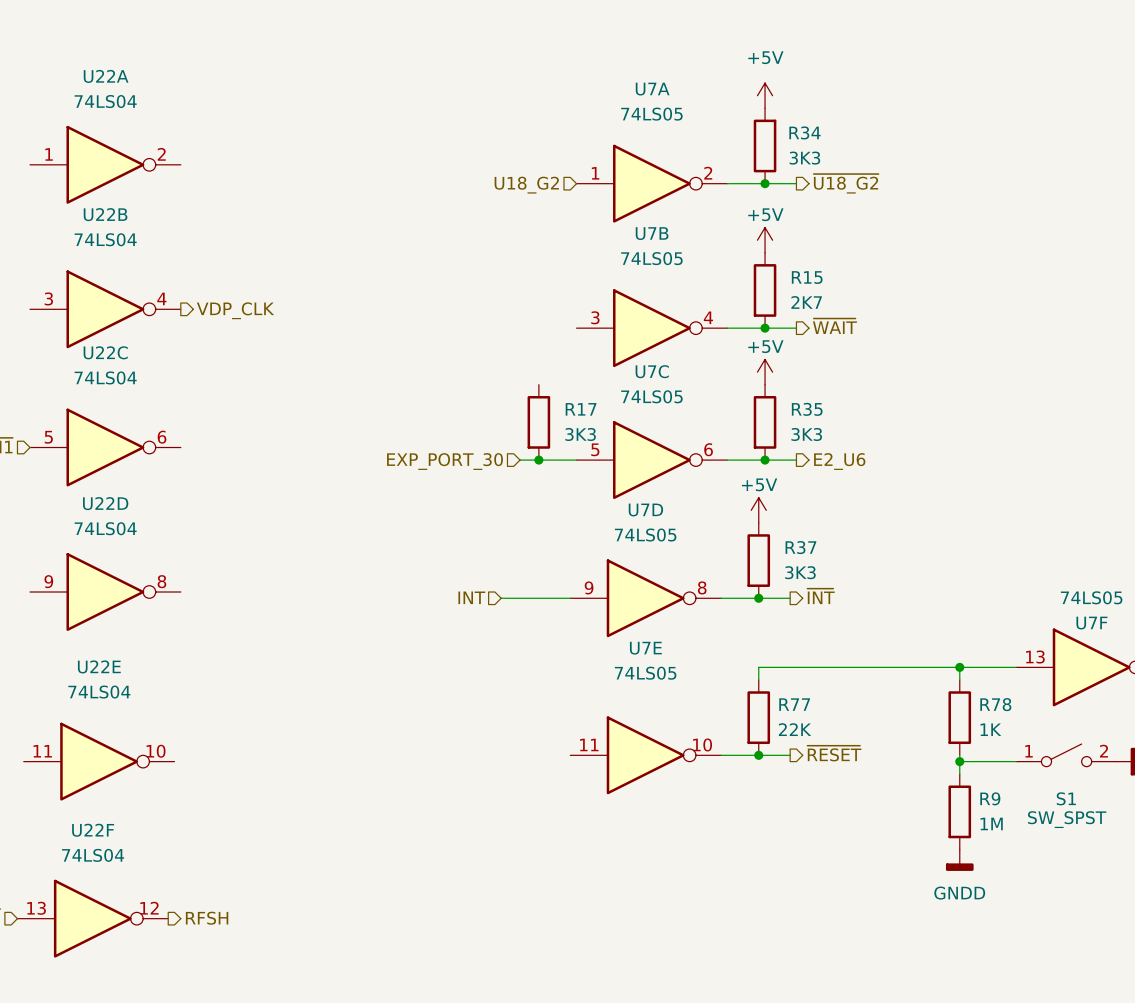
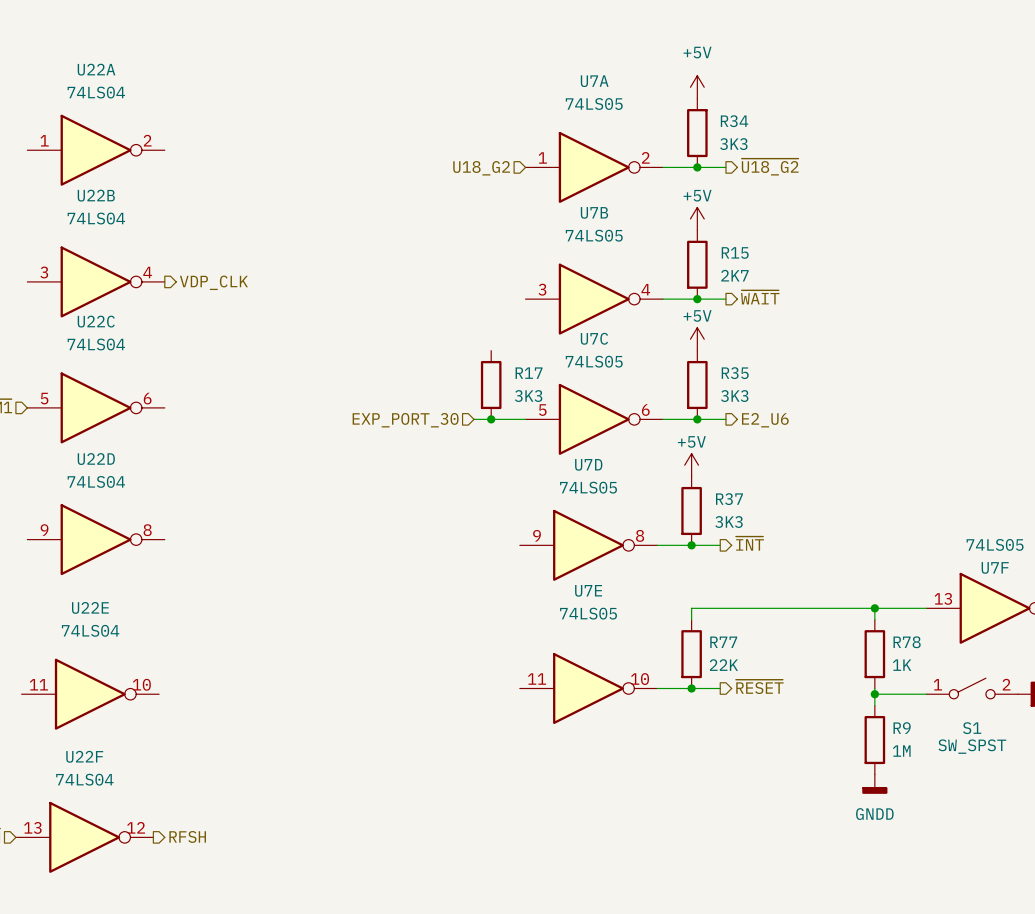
hierarchical label: INT (471, 597) -> none
wire: (501, 598) (570, 598) -> none

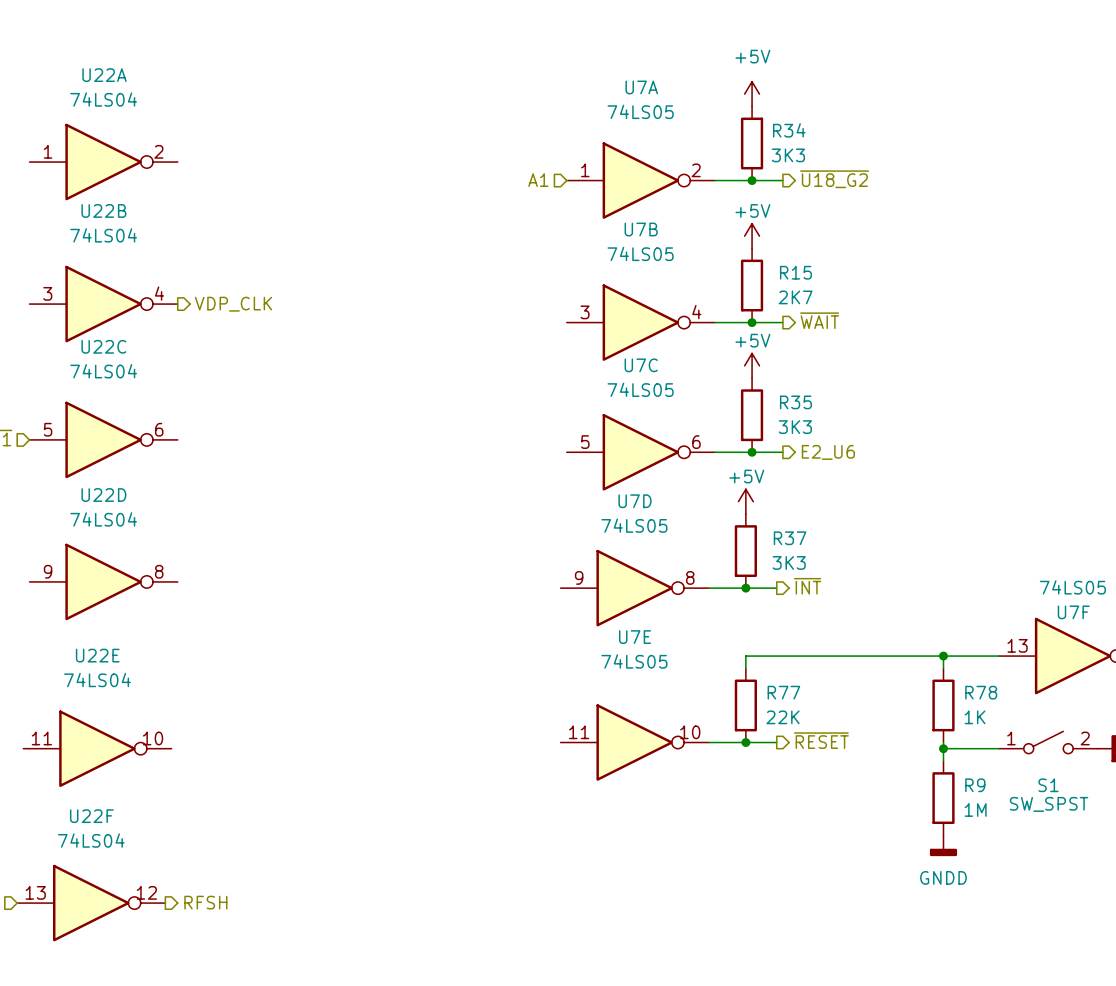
hierarchical label: U18_G2 (481, 168) -> A1 (538, 180)
R17: 3K3 (491, 385) -> none
wire: (474, 419) (525, 419) -> none
junction: (491, 419) -> none
hierarchical label: EXP_PORT_30 (405, 420) -> none

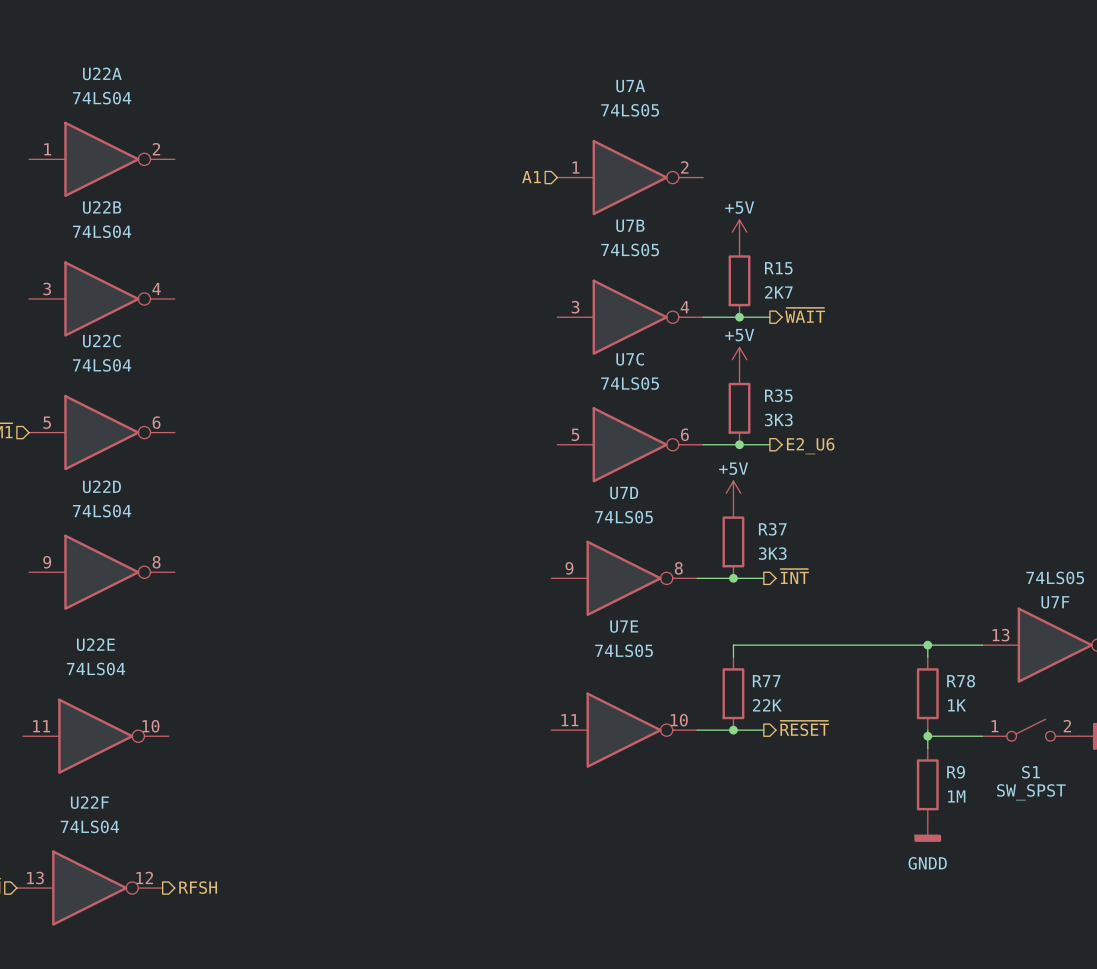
power symbol: +5V (752, 94) -> none
R34: 3K3 (752, 143) -> none
hierarchical label: ~{U18_G2} (834, 179) -> none
wire: (714, 180) (782, 180) -> none
junction: (752, 180) -> none
hierarchical label: VDP_CLK (233, 304) -> none

